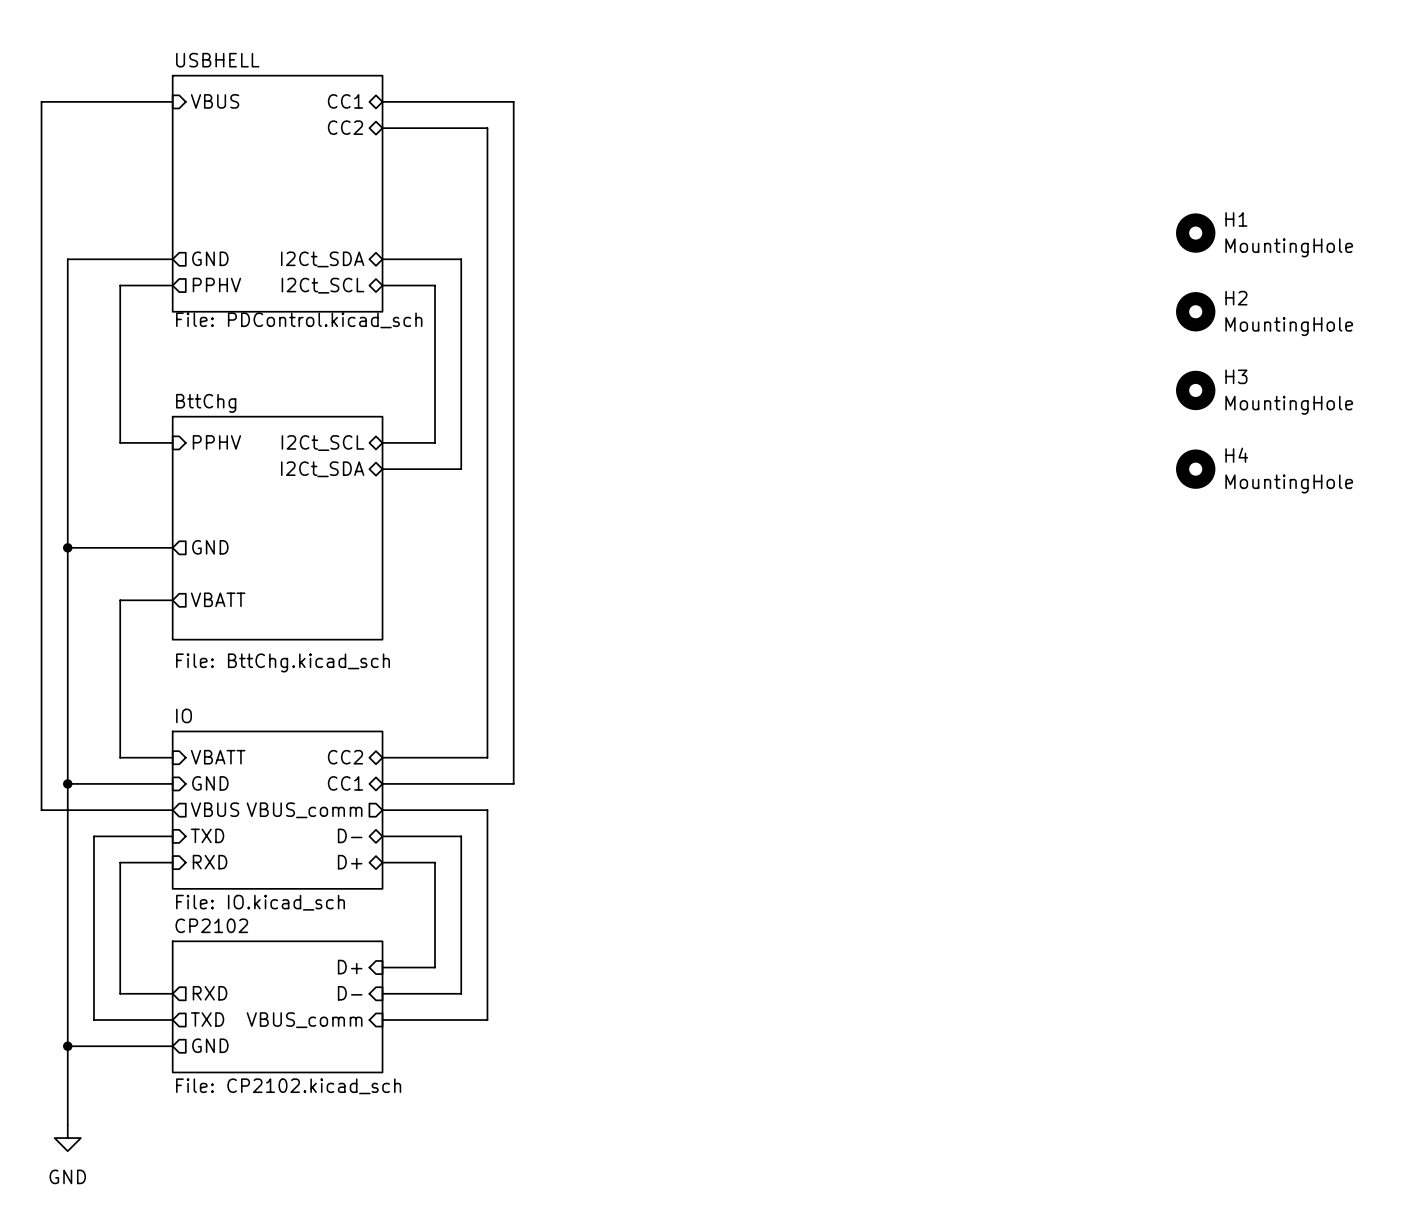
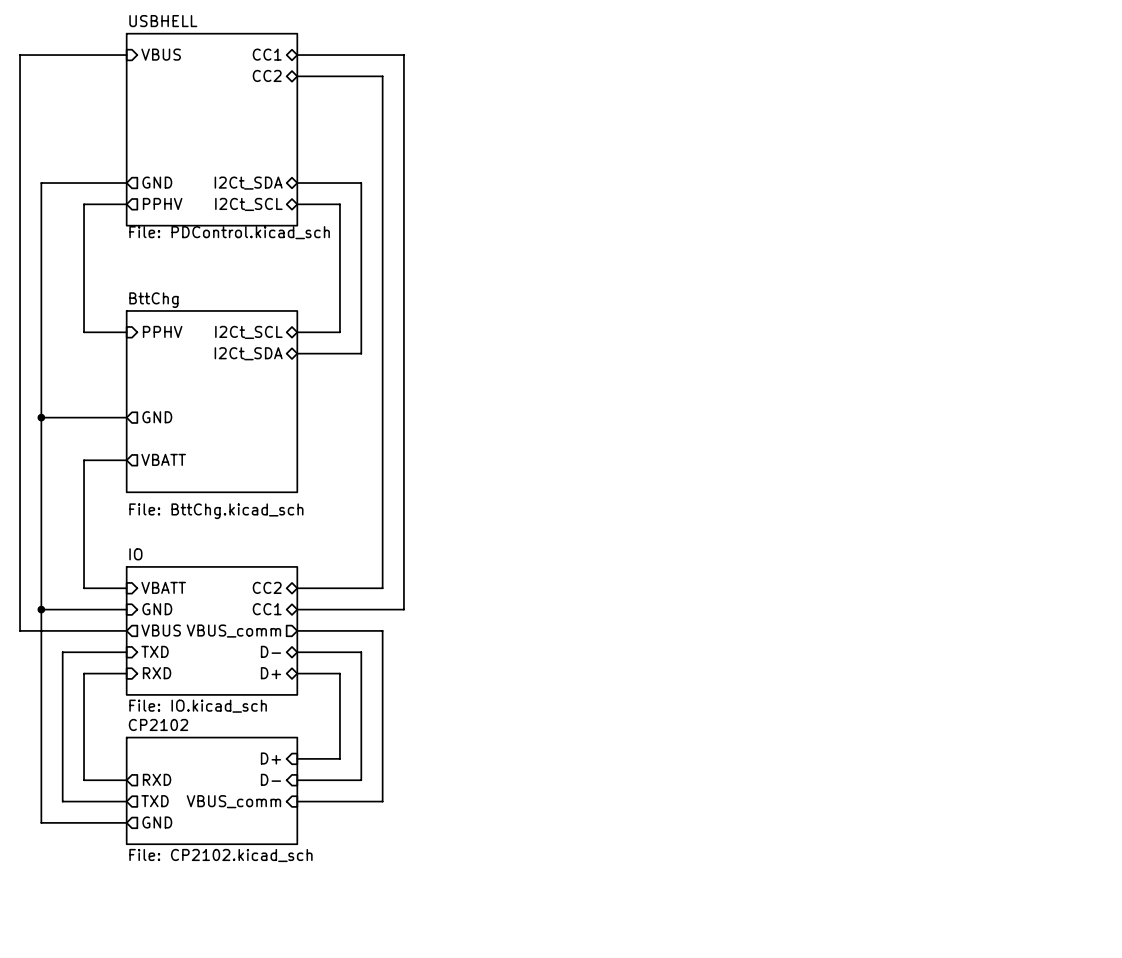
H1: MountingHole (1195, 233) -> none
H2: MountingHole (1195, 311) -> none
H3: MountingHole (1195, 390) -> none
H4: MountingHole (1195, 469) -> none
wire: (67, 1046) (67, 1124) -> none
junction: (67, 1046) -> none
power symbol: GND (67, 1138) -> none

